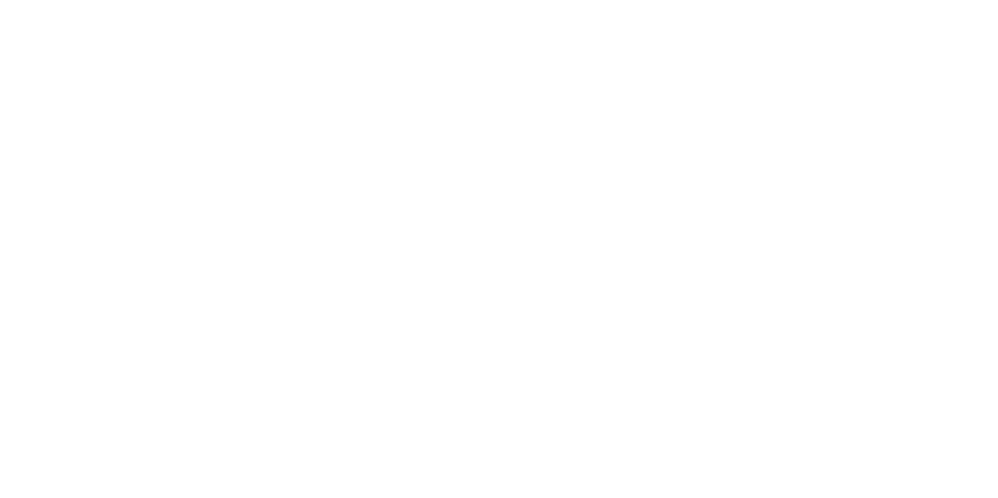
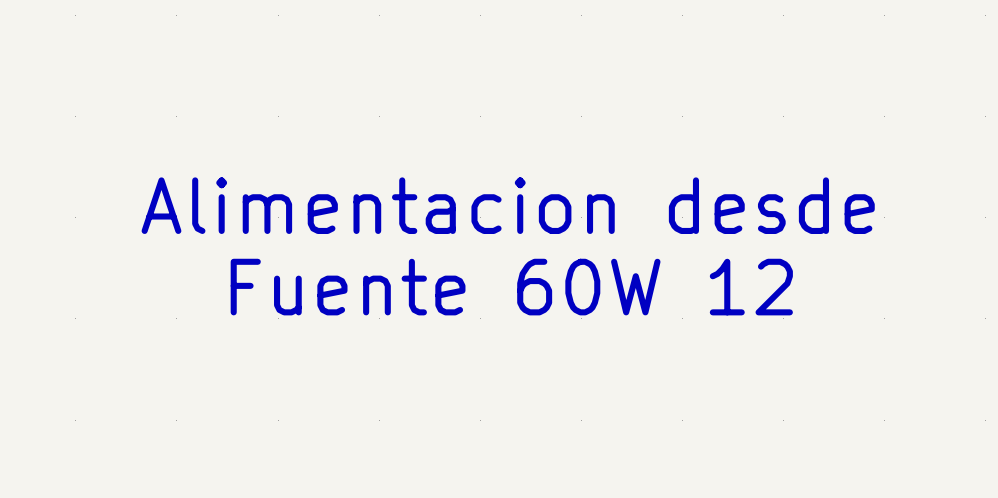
text: none -> Alimentacion desde (508, 205)
text: none -> Fuente 60W 12 (511, 287)

